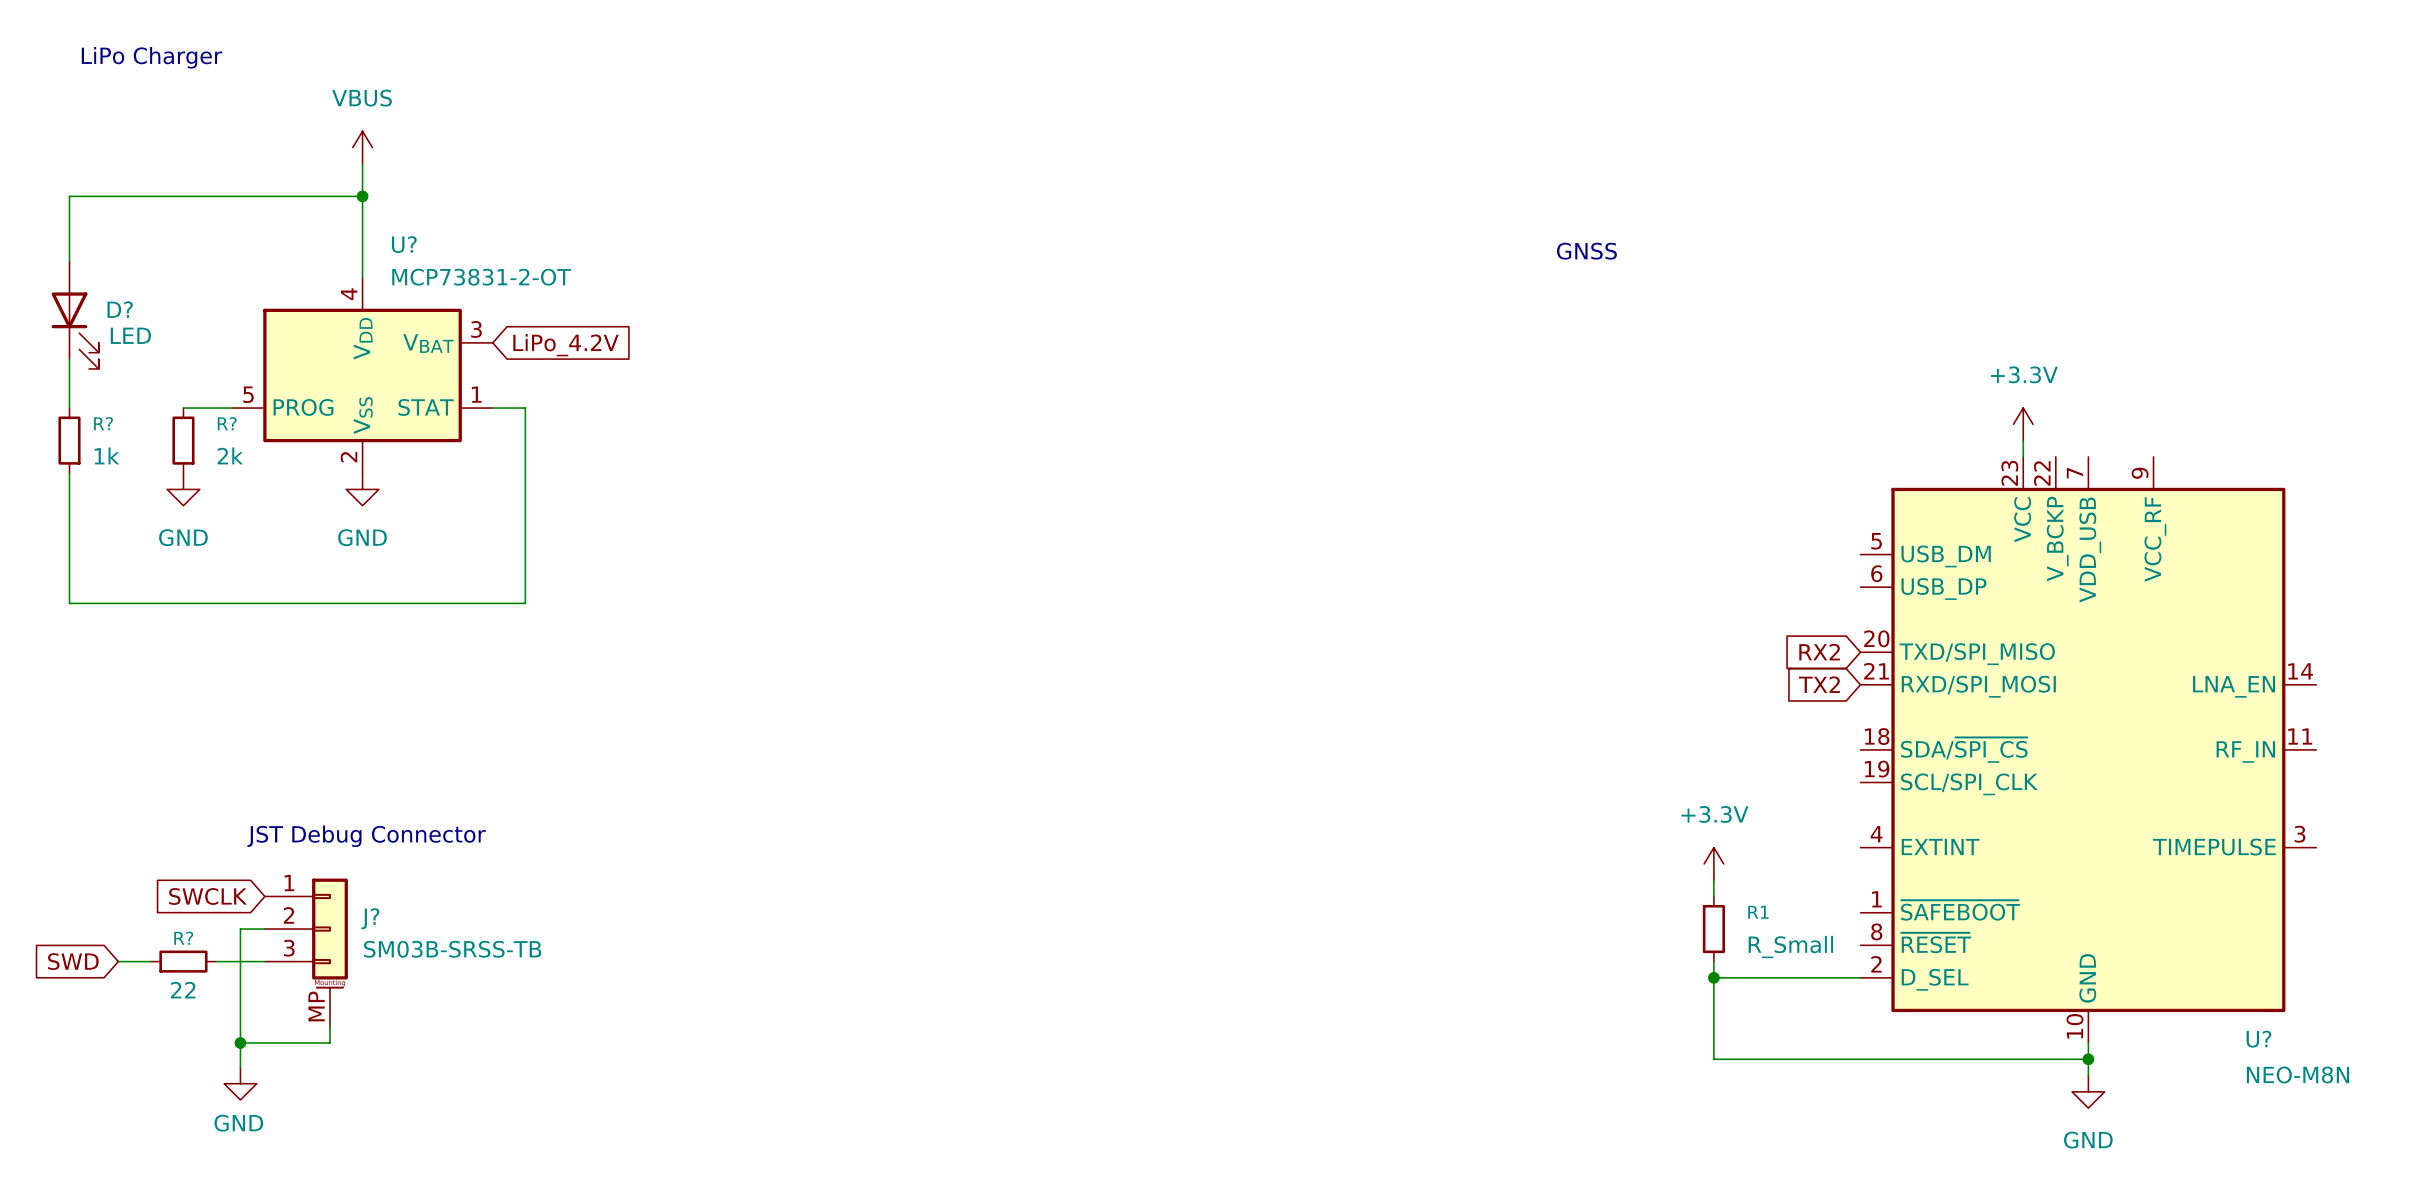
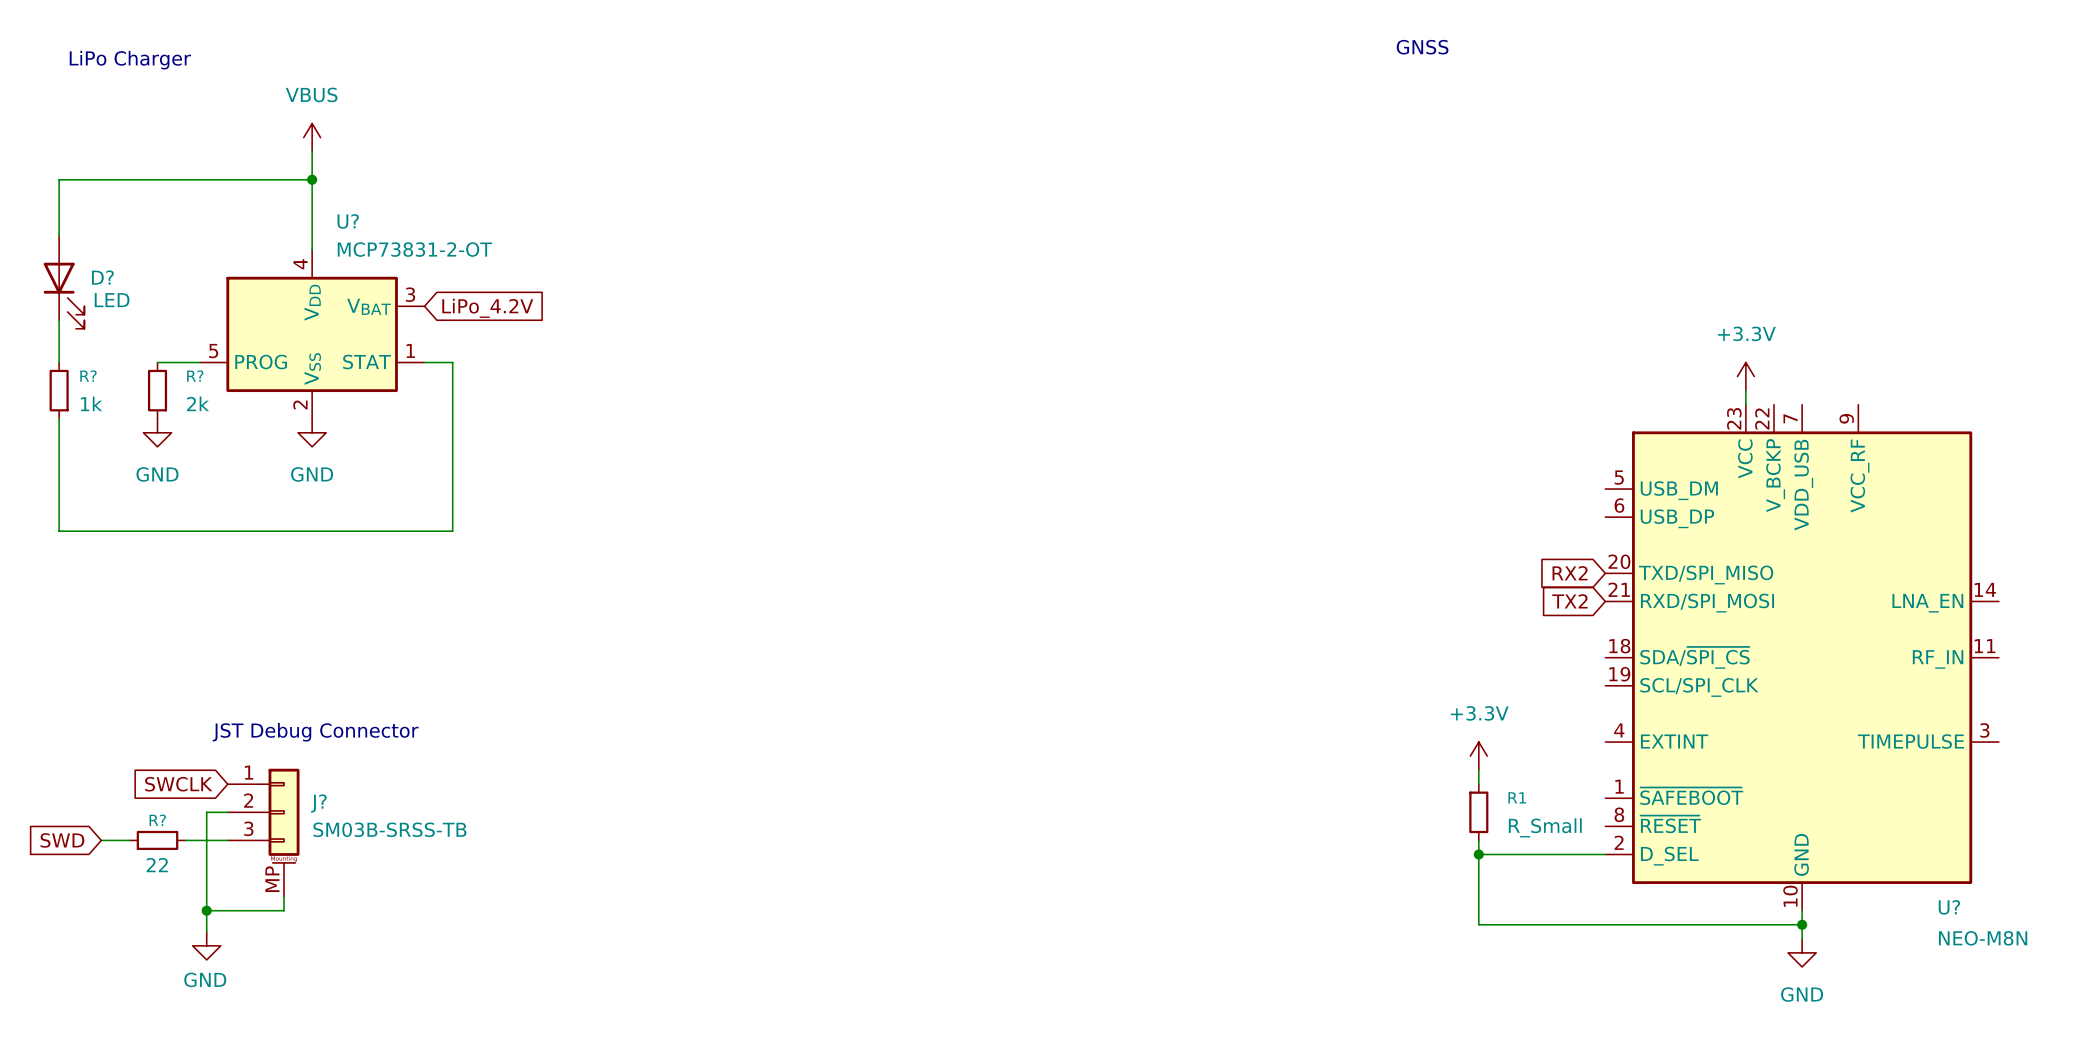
text position: GNSS (1586, 251) -> GNSS (1422, 47)

